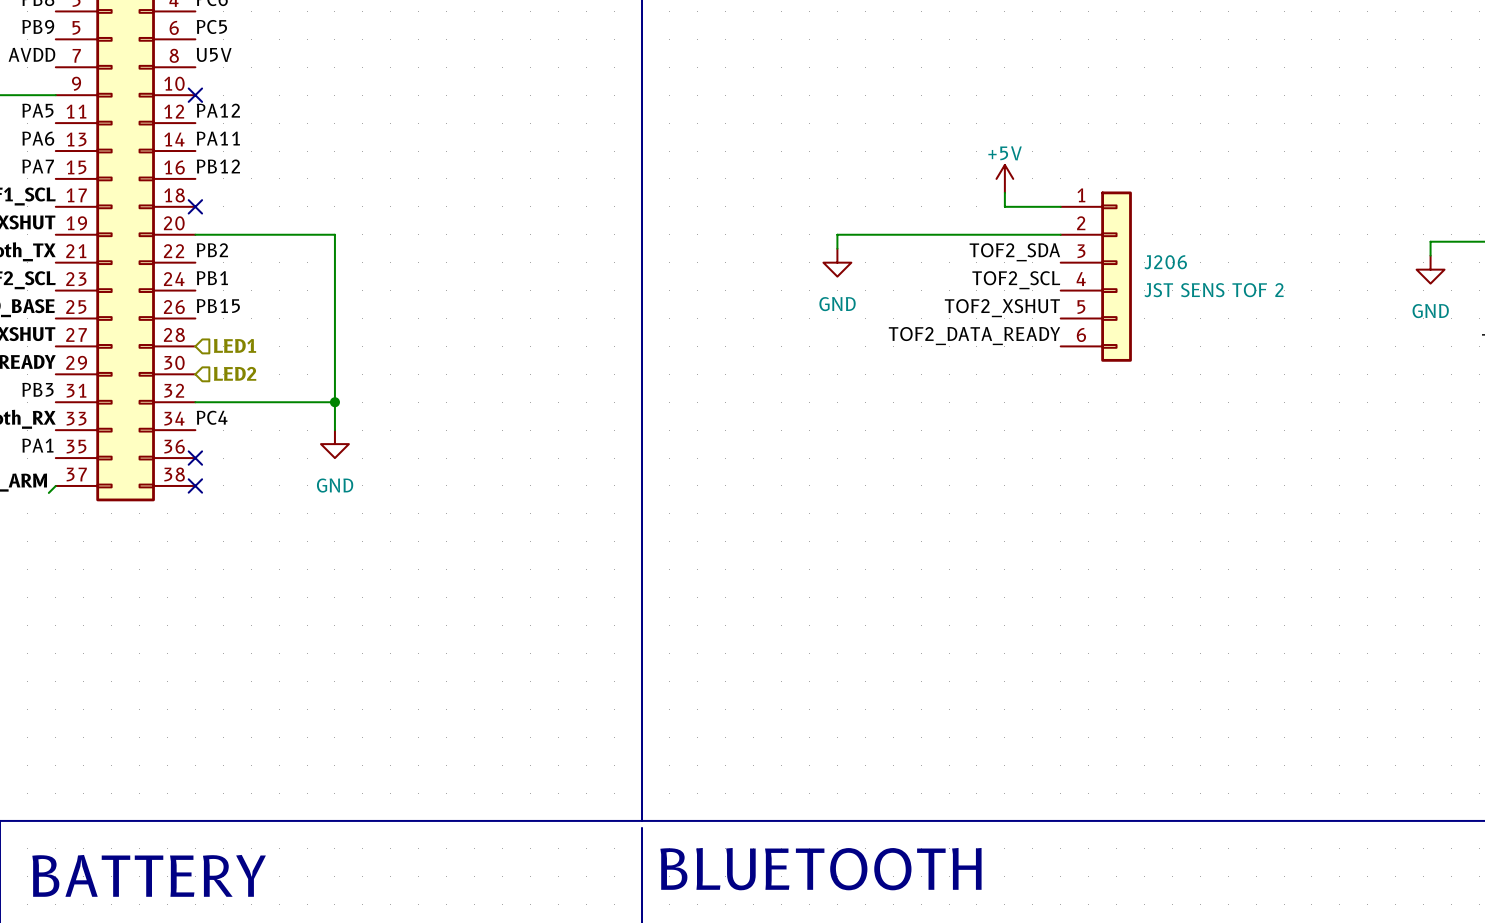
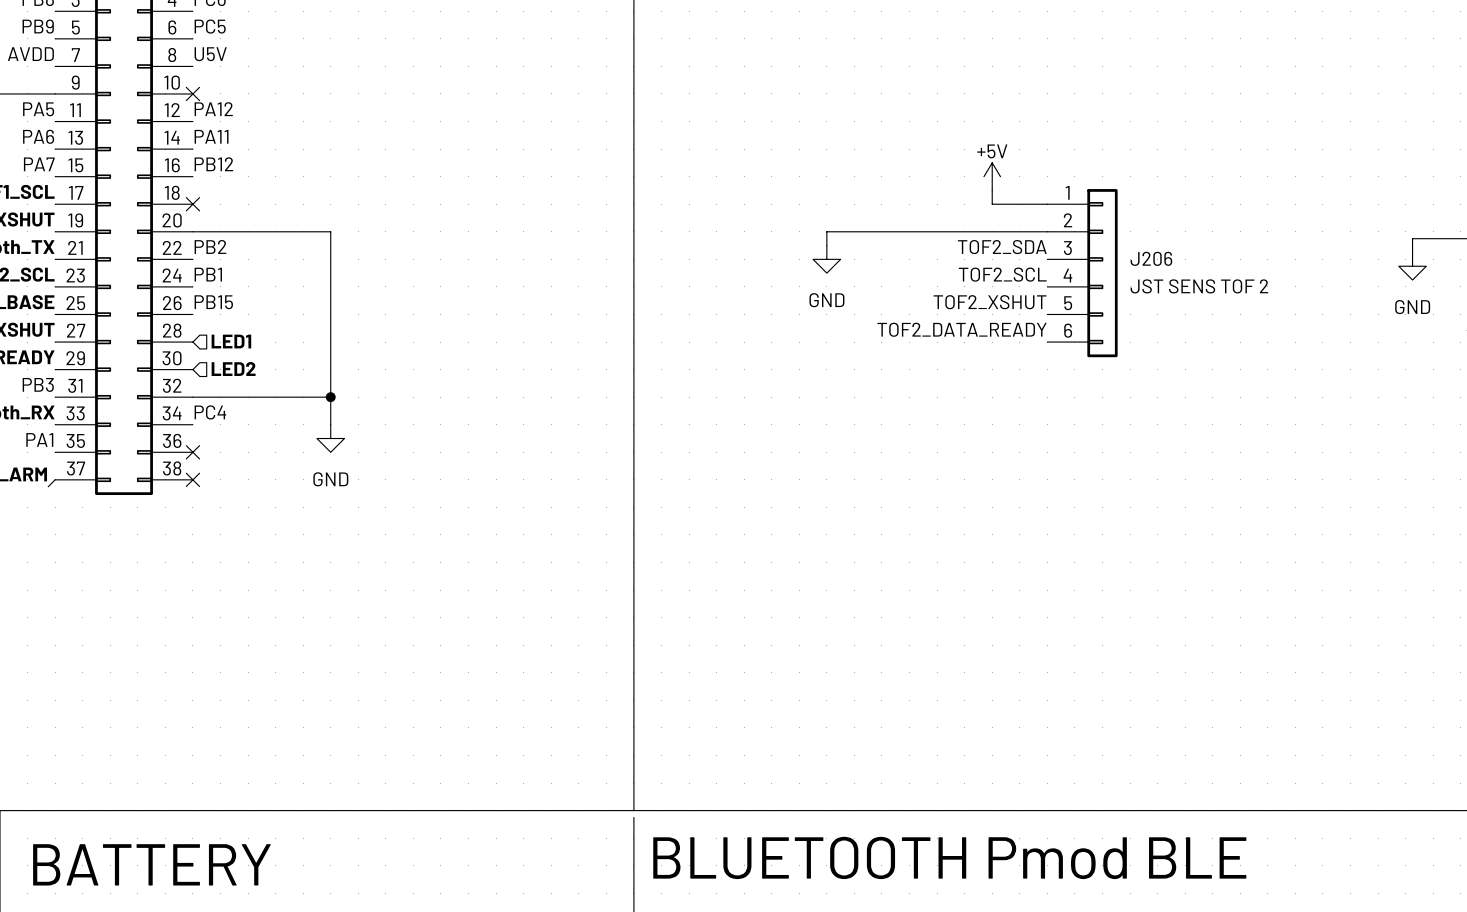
text: BLUETOOTH (820, 869) -> BLUETOOTH Pmod BLE (949, 857)

